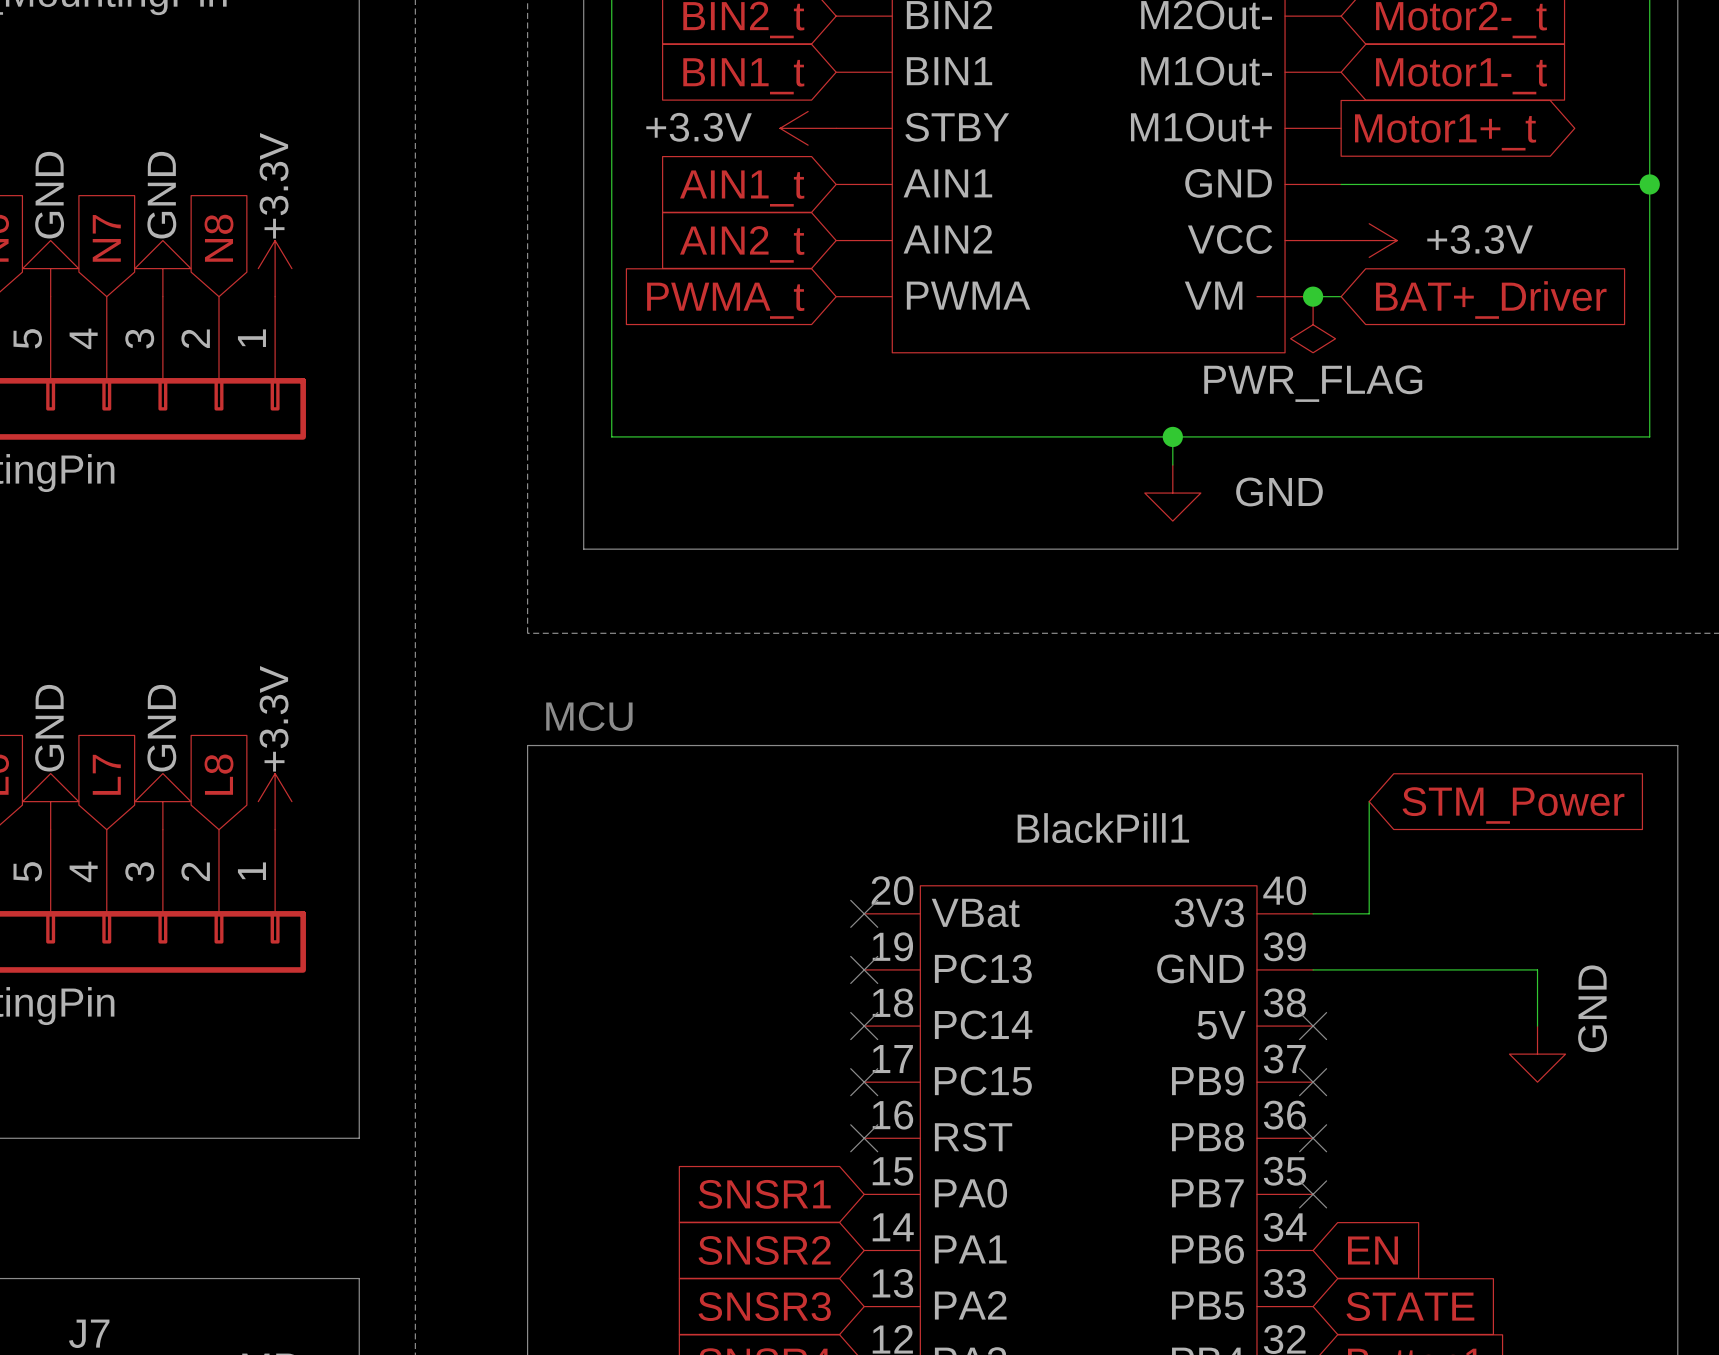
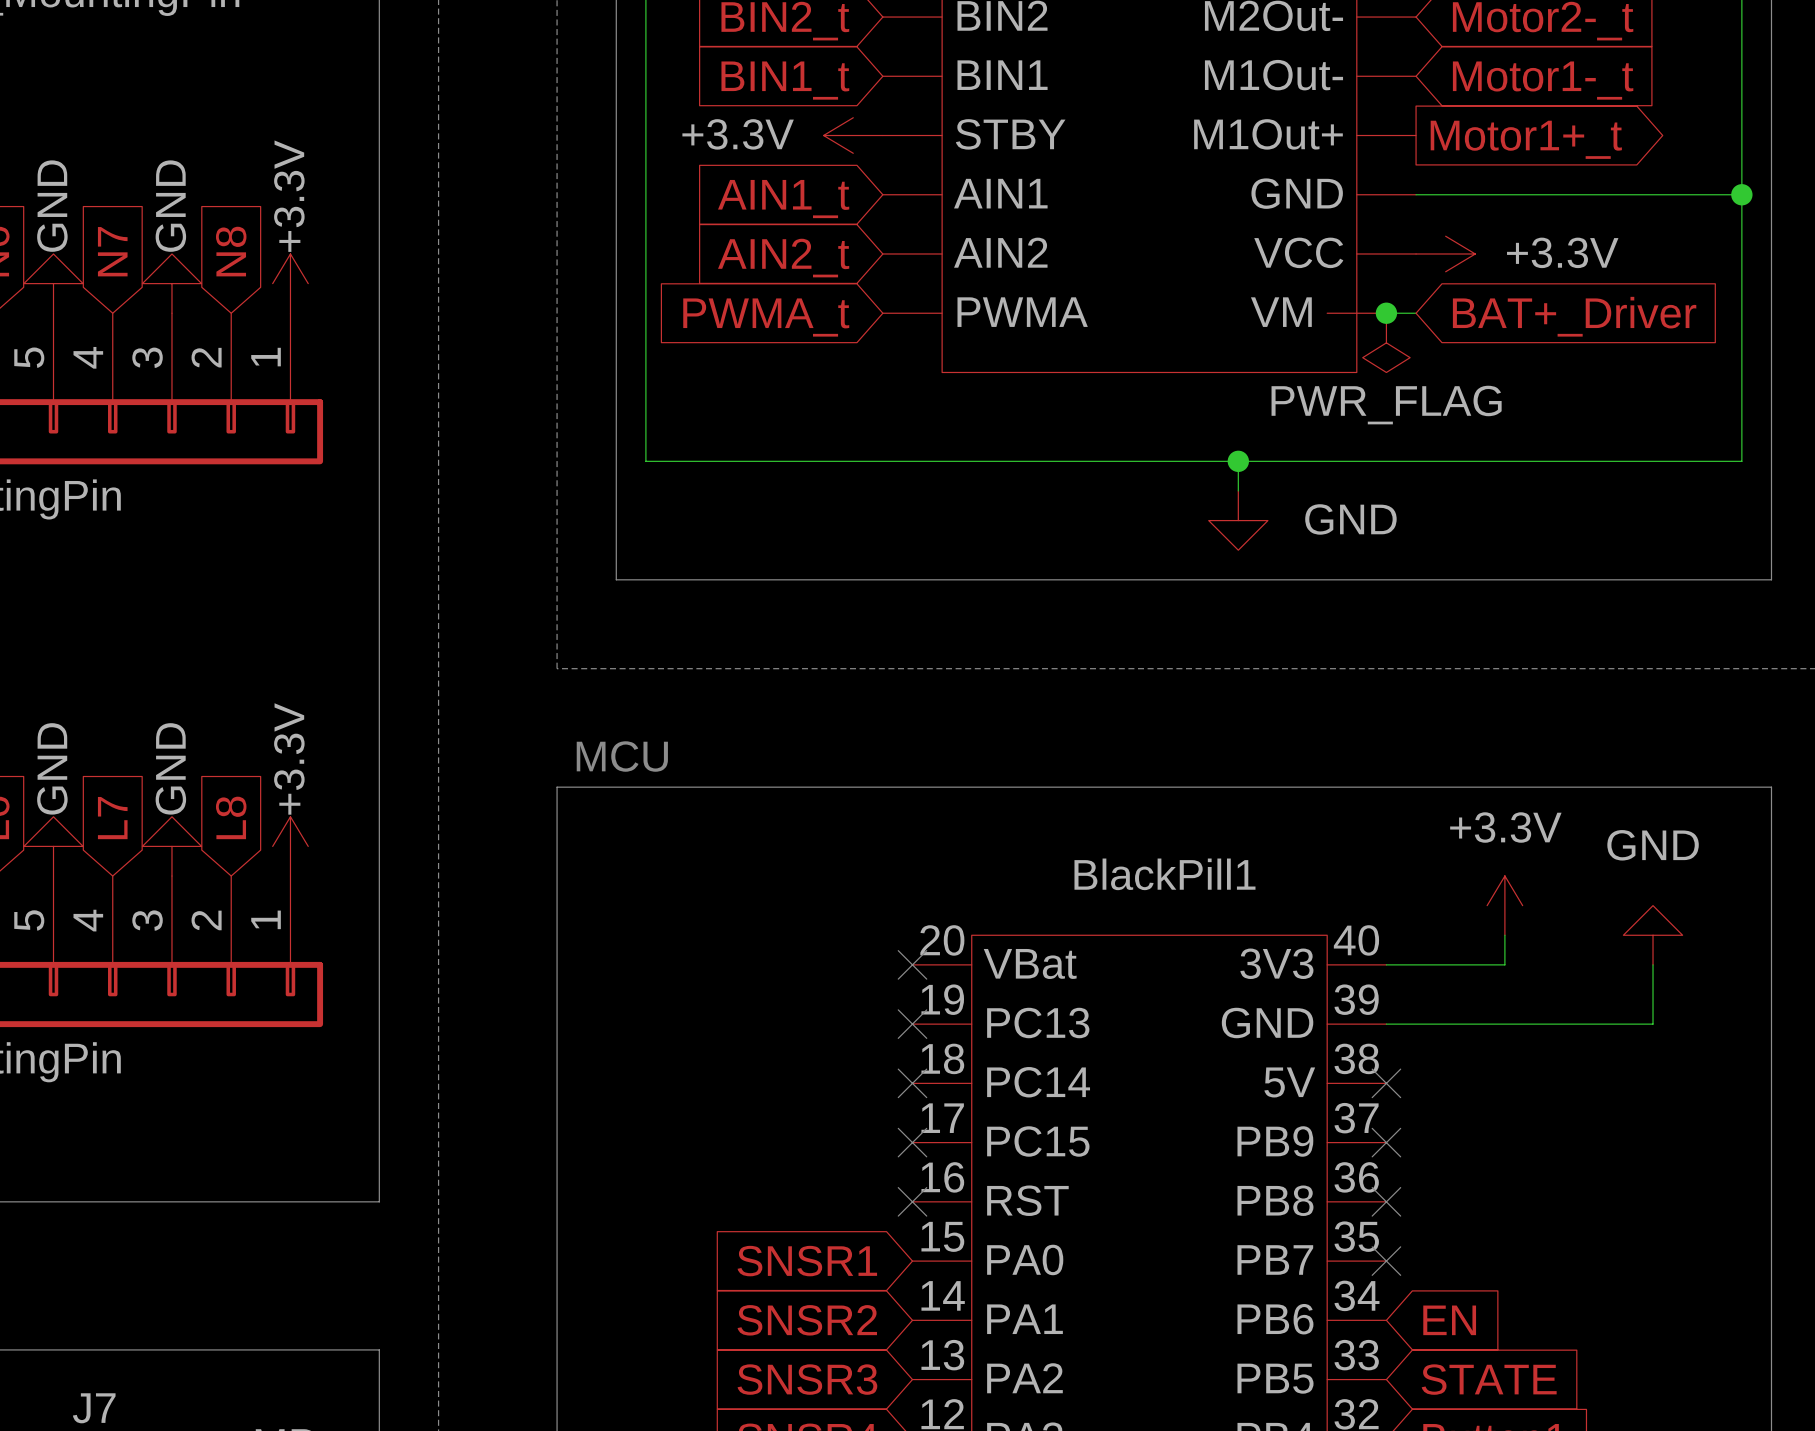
wire: (1369, 801) (1369, 913) -> (1504, 935) (1504, 964) (1445, 964)
global label: STM_Power (1513, 805) -> none
power symbol: none -> +3.3V (1504, 905)
wire: (1537, 969) (1537, 1026) -> (1623, 1024) (1653, 1024) (1653, 964)
power symbol text position: GND (1592, 1008) -> GND (1653, 845)
power symbol rotation: 0° (1537, 1054) -> 180° (1653, 935)
power symbol position: GND (1537, 1054) -> GND (1653, 935)

